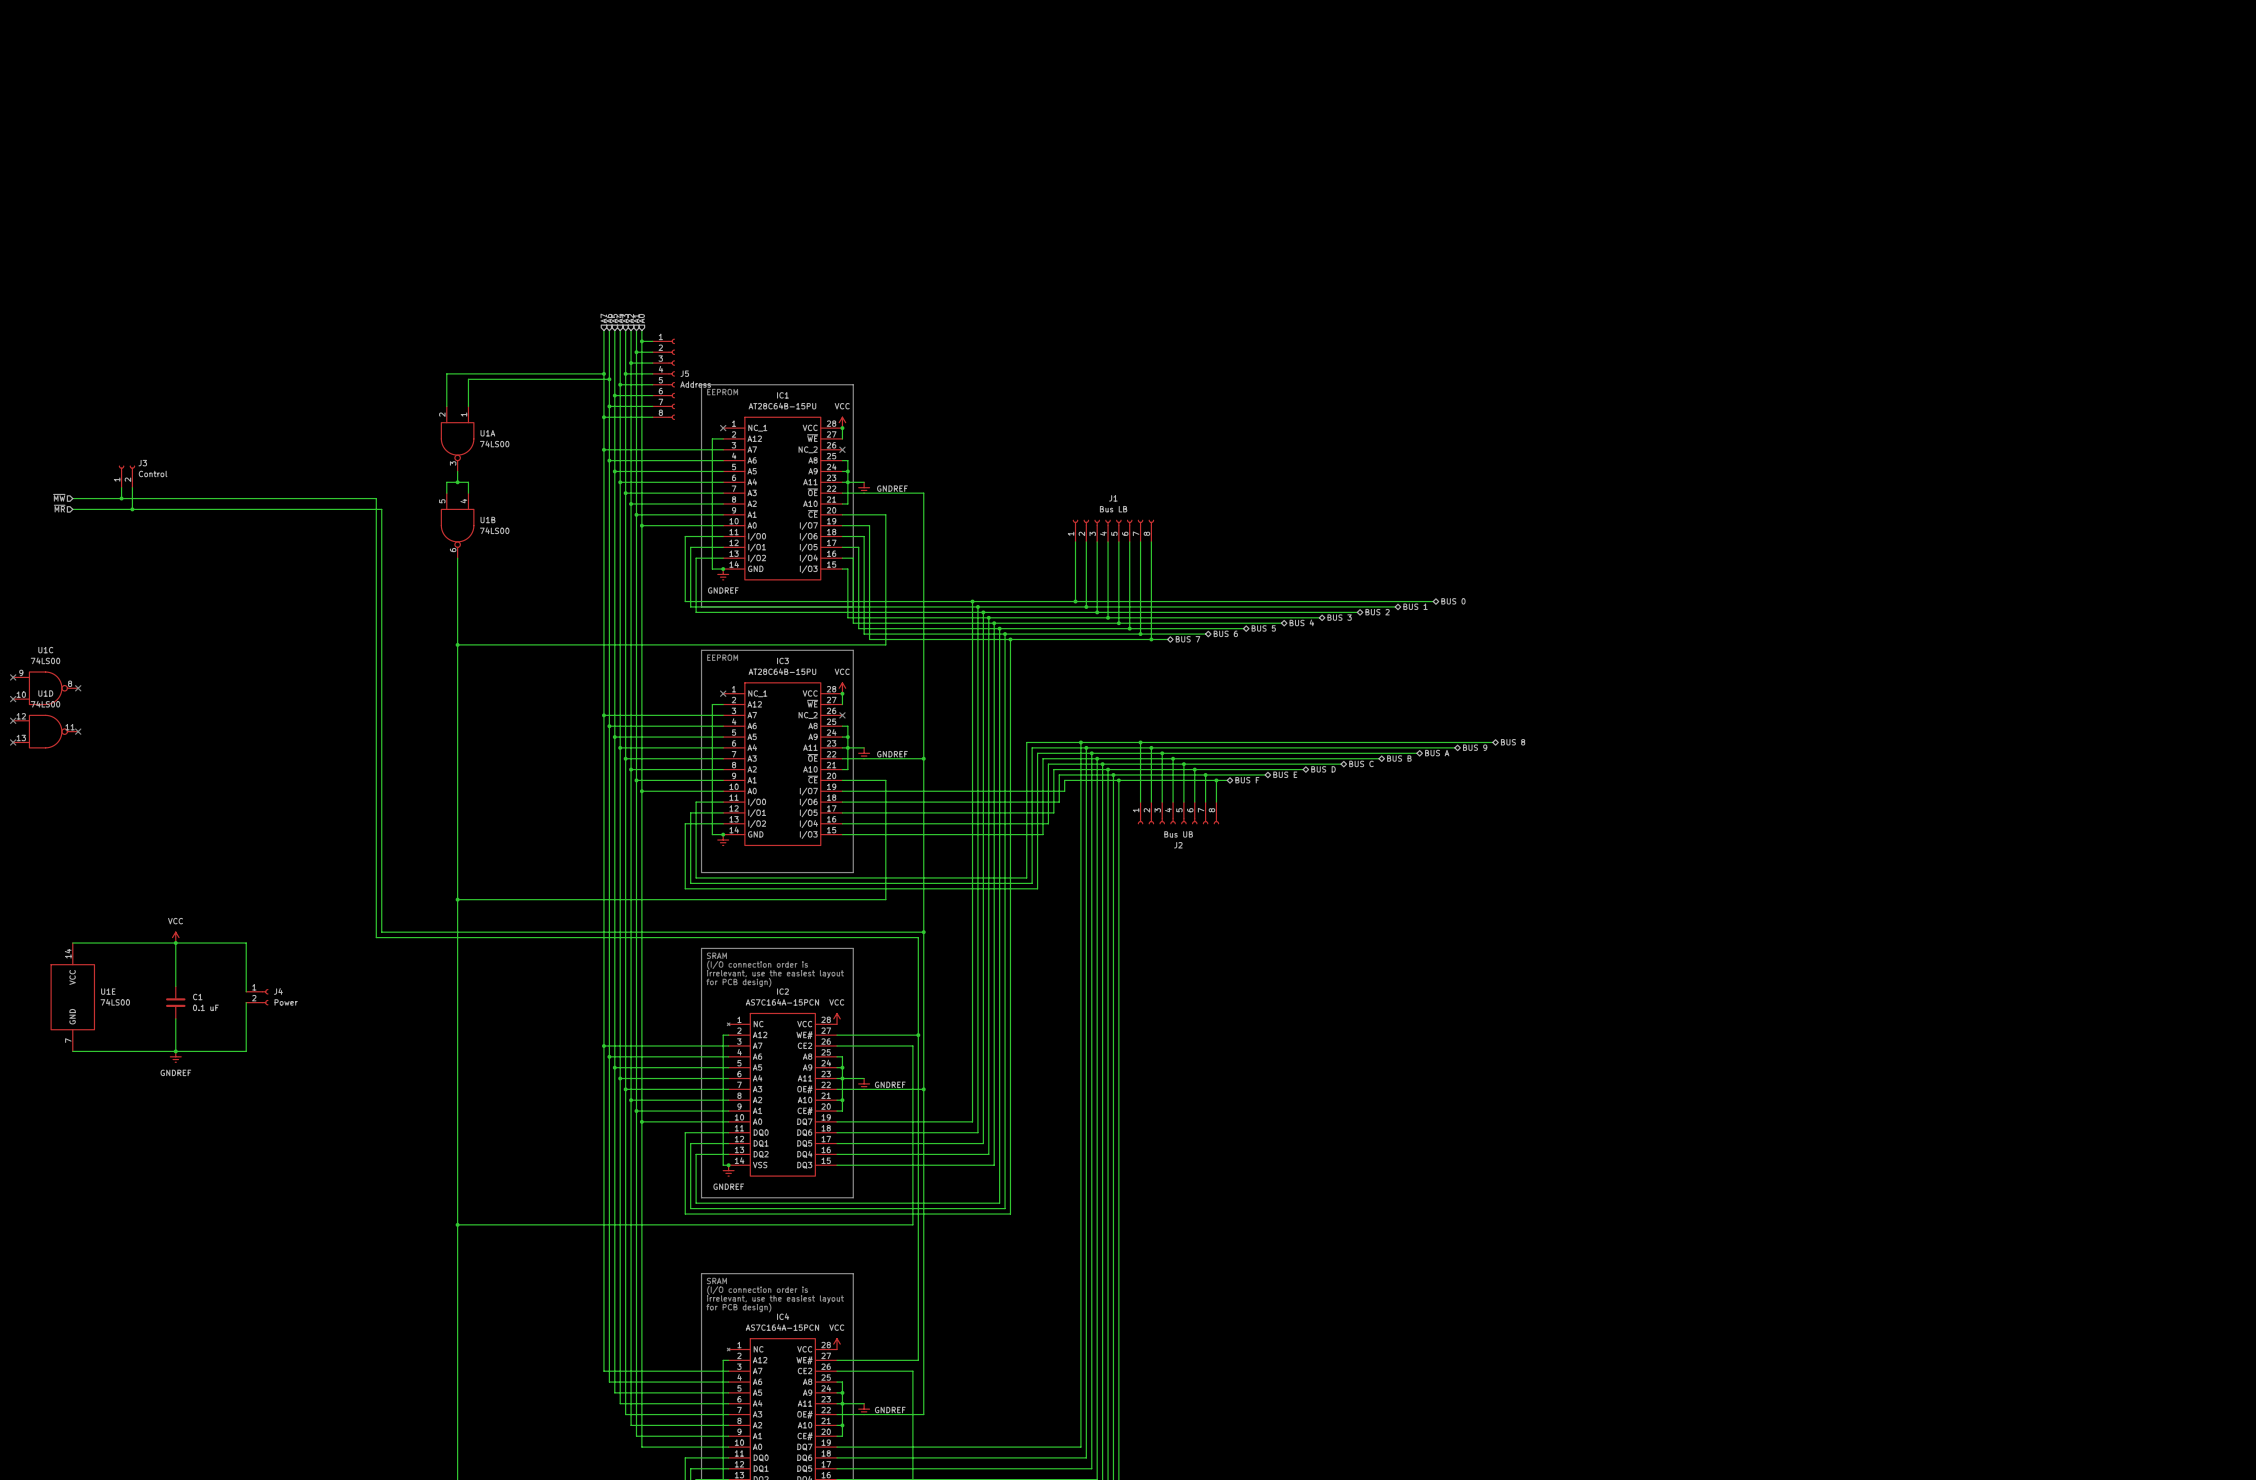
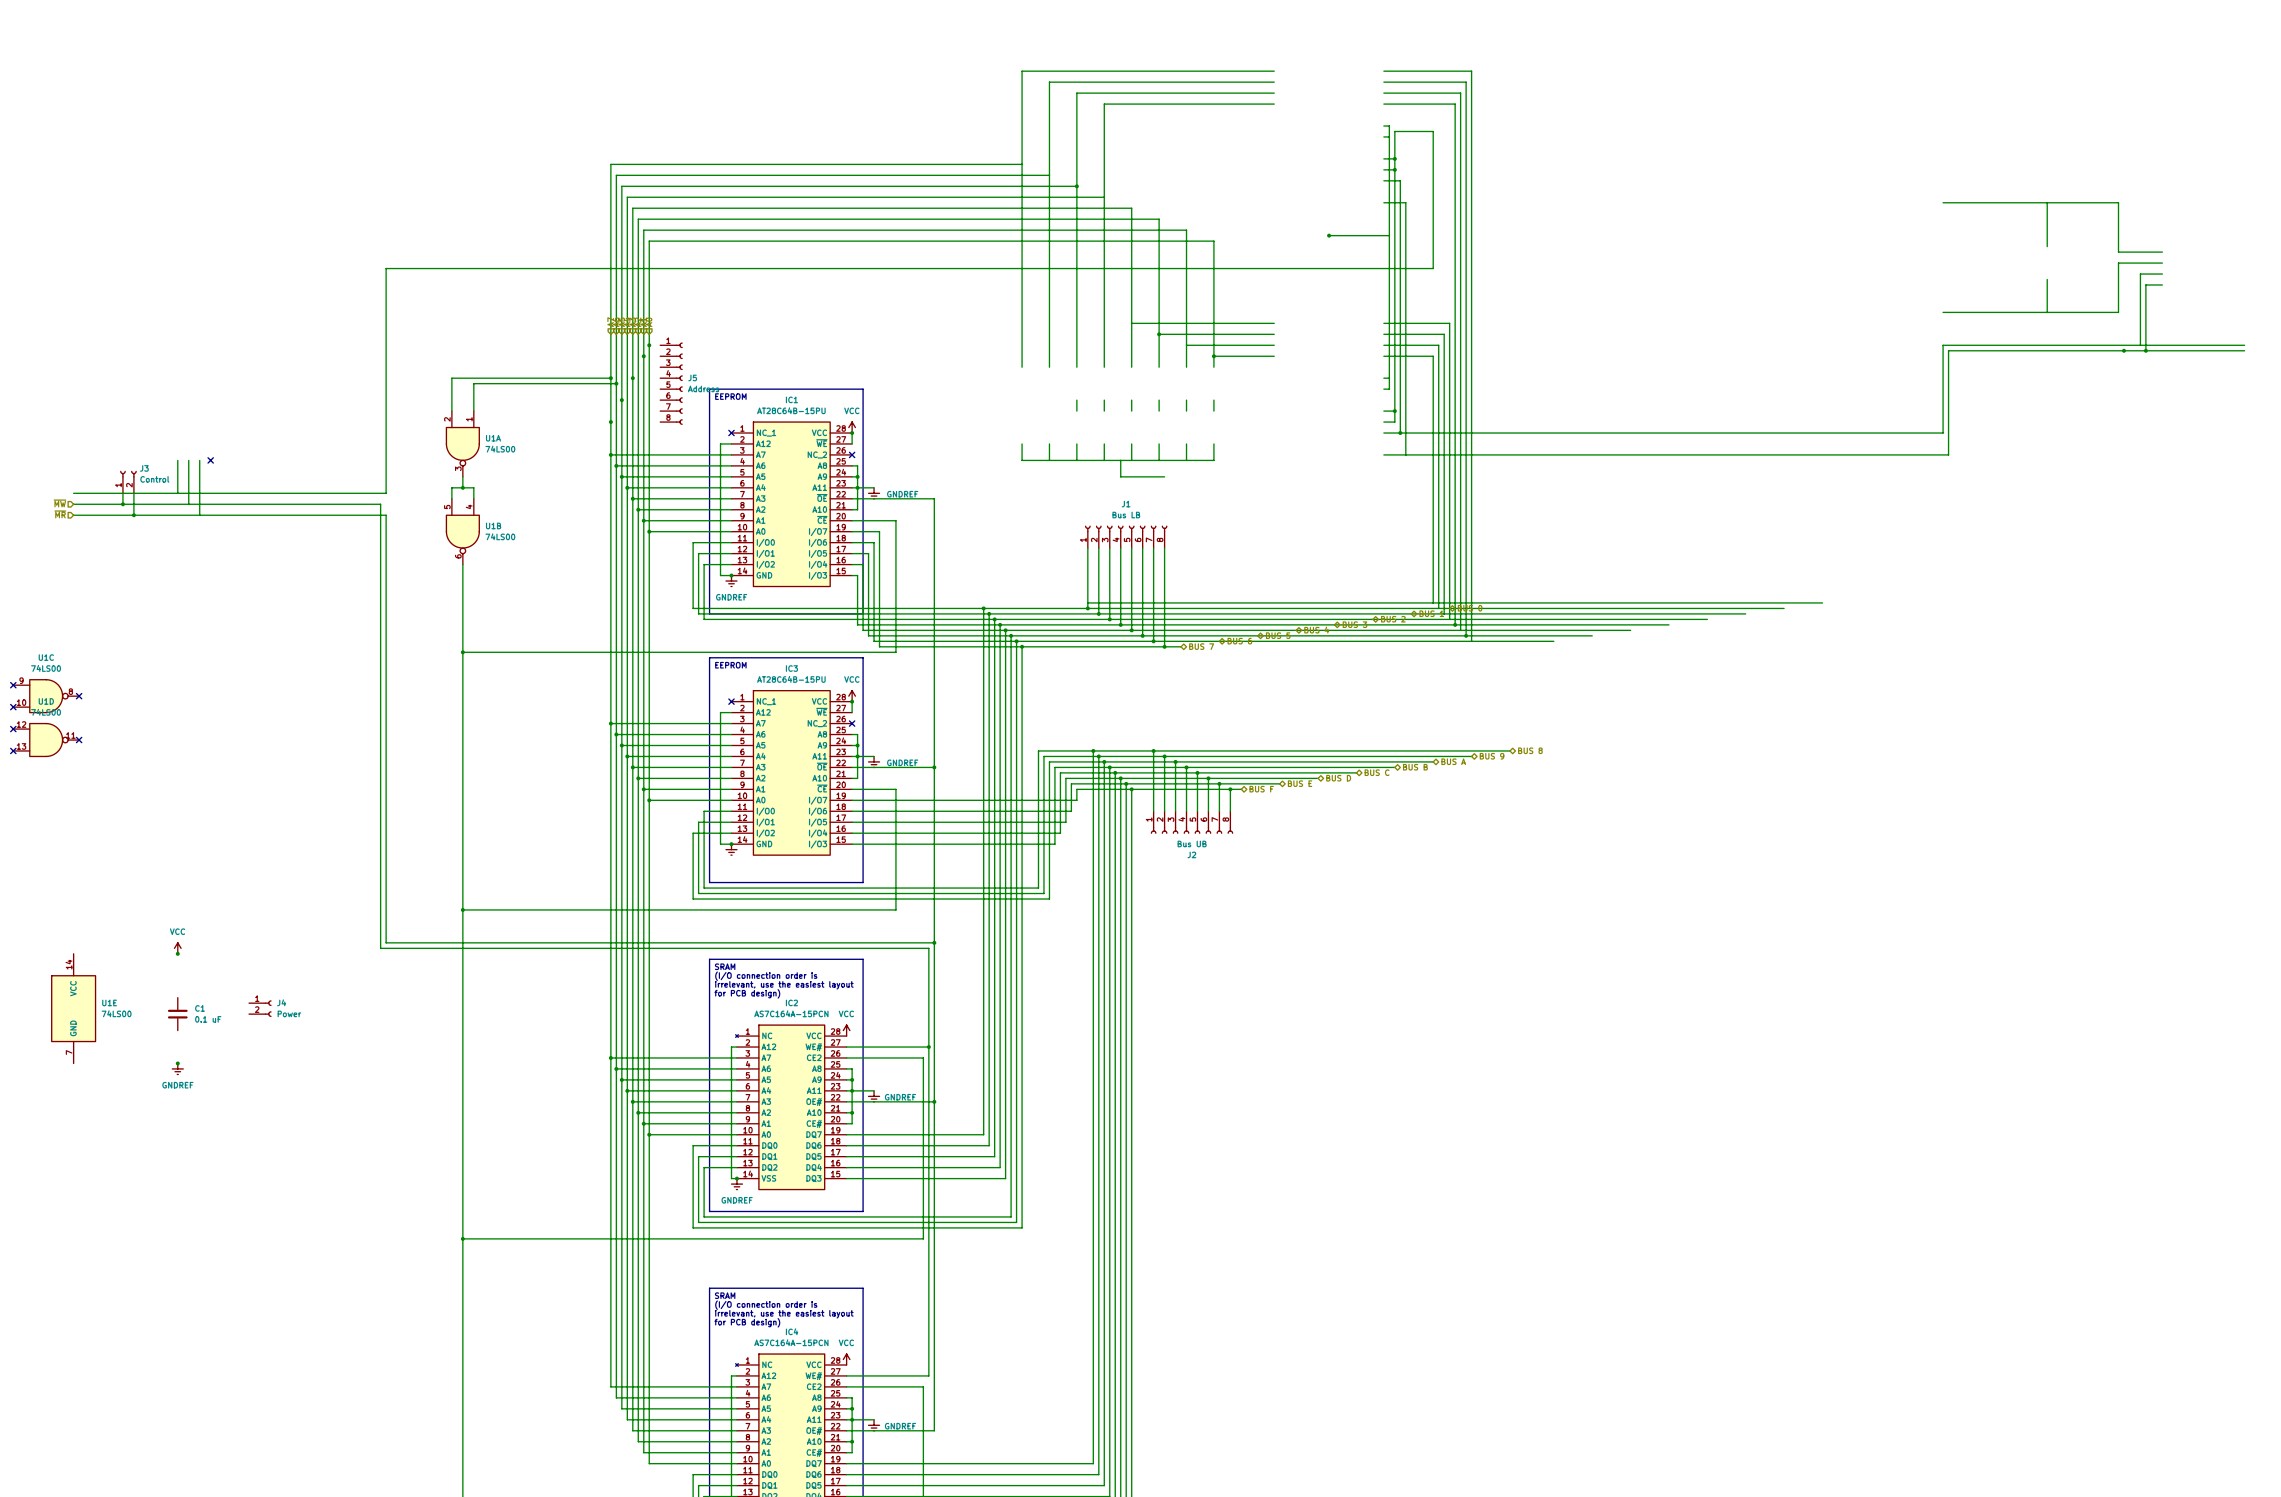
wire: none -> (1274, 71) (1022, 71) (1022, 367)
wire: none -> (1383, 71) (1471, 71) (1471, 641)
wire: none -> (1274, 82) (1049, 82) (1049, 367)
wire: none -> (1383, 82) (1466, 82) (1466, 635)
wire: none -> (1274, 93) (1076, 93) (1076, 367)
wire: none -> (1383, 93) (1460, 93) (1460, 630)
wire: none -> (1274, 104) (1104, 104) (1104, 367)
wire: none -> (1383, 104) (1455, 104) (1455, 624)
wire: none -> (1383, 126) (1389, 126) (1389, 389) (1383, 389)
wire: none -> (1383, 136) (1389, 136)
wire: none -> (1383, 158) (1394, 158)
junction: none -> (1394, 158)
wire: none -> (1022, 164) (610, 164) (610, 334)
wire: none -> (1383, 169) (1394, 169)
junction: none -> (1394, 169)
wire: none -> (1049, 175) (616, 175) (616, 334)
wire: none -> (1383, 180) (1400, 180) (1400, 433)
wire: none -> (1076, 186) (621, 186) (621, 334)
junction: none -> (1076, 186)
wire: none -> (1104, 197) (627, 197) (627, 334)
wire: none -> (1383, 202) (1405, 202) (1405, 454)
wire: none -> (1943, 202) (2118, 202) (2118, 252) (2162, 252)
wire: none -> (2047, 202) (2047, 246)
wire: none -> (1329, 235) (1389, 235)
junction: none -> (1329, 235)
wire: none -> (2162, 263) (2118, 263) (2118, 312) (1943, 312)
wire: none -> (2162, 274) (2140, 274) (2140, 345)
wire: none -> (2047, 279) (2047, 312)
wire: none -> (2162, 284) (2145, 284) (2145, 350)
wire: none -> (1131, 323) (1274, 323)
wire: none -> (1383, 323) (1449, 323) (1449, 619)
wire: none -> (632, 334) (632, 208) (1131, 208) (1131, 367)
wire: none -> (638, 334) (638, 219) (1159, 219) (1159, 367)
wire: none -> (643, 334) (643, 230) (1186, 230) (1186, 367)
wire: none -> (649, 334) (649, 241) (1213, 241) (1213, 367)
wire: none -> (1159, 334) (1274, 334)
junction: none -> (1159, 334)
wire: none -> (1383, 334) (1444, 334) (1444, 613)
wire: (641, 341) (652, 341) -> none
wire: none -> (1186, 345) (1274, 345)
wire: none -> (1383, 345) (1438, 345) (1438, 608)
wire: none -> (2244, 345) (1943, 345) (1943, 433) (1383, 433)
junction: none -> (2123, 350)
junction: none -> (2145, 350)
wire: none -> (2244, 350) (1948, 350) (1948, 454) (1383, 454)
wire: (636, 352) (652, 352) -> none
wire: none -> (1213, 356) (1274, 356)
junction: none -> (1213, 356)
wire: none -> (1383, 356) (1433, 356) (1433, 602)
wire: (631, 363) (652, 363) -> none
junction: (631, 363) -> none
wire: (625, 373) (652, 373) -> none
wire: none -> (1383, 378) (1389, 378)
wire: (620, 384) (652, 384) -> none
junction: (620, 384) -> none
wire: (614, 395) (652, 395) -> none
wire: none -> (1076, 400) (1076, 411)
wire: none -> (1104, 400) (1104, 411)
wire: none -> (1131, 400) (1131, 411)
wire: none -> (1159, 400) (1159, 411)
wire: none -> (1186, 400) (1186, 411)
wire: none -> (1213, 400) (1213, 411)
wire: (609, 406) (652, 406) -> none
junction: (609, 406) -> none
wire: none -> (1383, 411) (1394, 411)
junction: none -> (1394, 411)
wire: (603, 417) (652, 417) -> none
wire: none -> (1383, 422) (1394, 422) (1394, 131) (1433, 131) (1433, 268) (386, 268) (386, 493) (73, 493)
junction: none -> (1400, 433)
wire: none -> (1022, 443) (1022, 460) (1213, 460) (1213, 443)
wire: none -> (1049, 443) (1049, 460)
wire: none -> (1076, 443) (1076, 460)
wire: none -> (1104, 443) (1104, 460)
wire: none -> (1131, 443) (1131, 460)
wire: none -> (1159, 443) (1159, 460)
wire: none -> (1186, 443) (1186, 460)
wire: none -> (177, 460) (177, 493)
wire: none -> (188, 460) (188, 504)
wire: none -> (199, 460) (199, 515)
no-connect mark: none -> (210, 460)
wire: none -> (1120, 460) (1120, 476) (1164, 476)
wire: none -> (1087, 602) (1822, 602)
wire: none -> (1449, 608) (1784, 608)
wire: none -> (1411, 613) (1745, 613)
wire: none -> (1372, 619) (1707, 619)
wire: none -> (1334, 624) (1668, 624)
junction: none -> (1455, 624)
wire: none -> (1296, 630) (1630, 630)
wire: none -> (1257, 635) (1592, 635)
junction: none -> (1466, 635)
wire: none -> (1219, 641) (1553, 641)
wire: (72, 943) (246, 943) (246, 991) -> none
wire: (175, 943) (175, 986) -> none
wire: (246, 1002) (246, 1051) (72, 1051) -> none
wire: (175, 1018) (175, 1051) -> none

